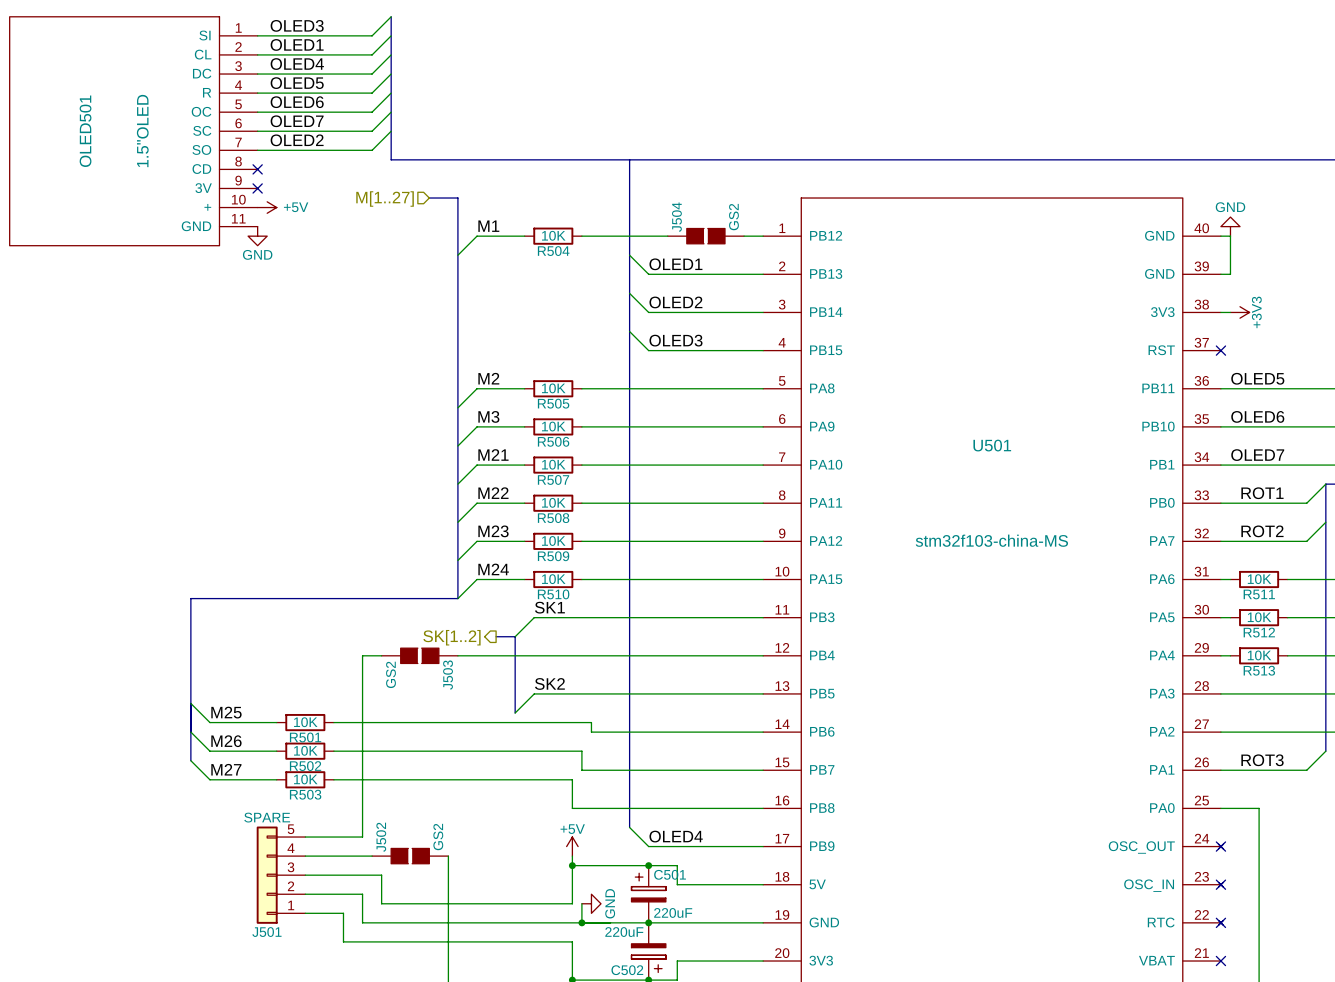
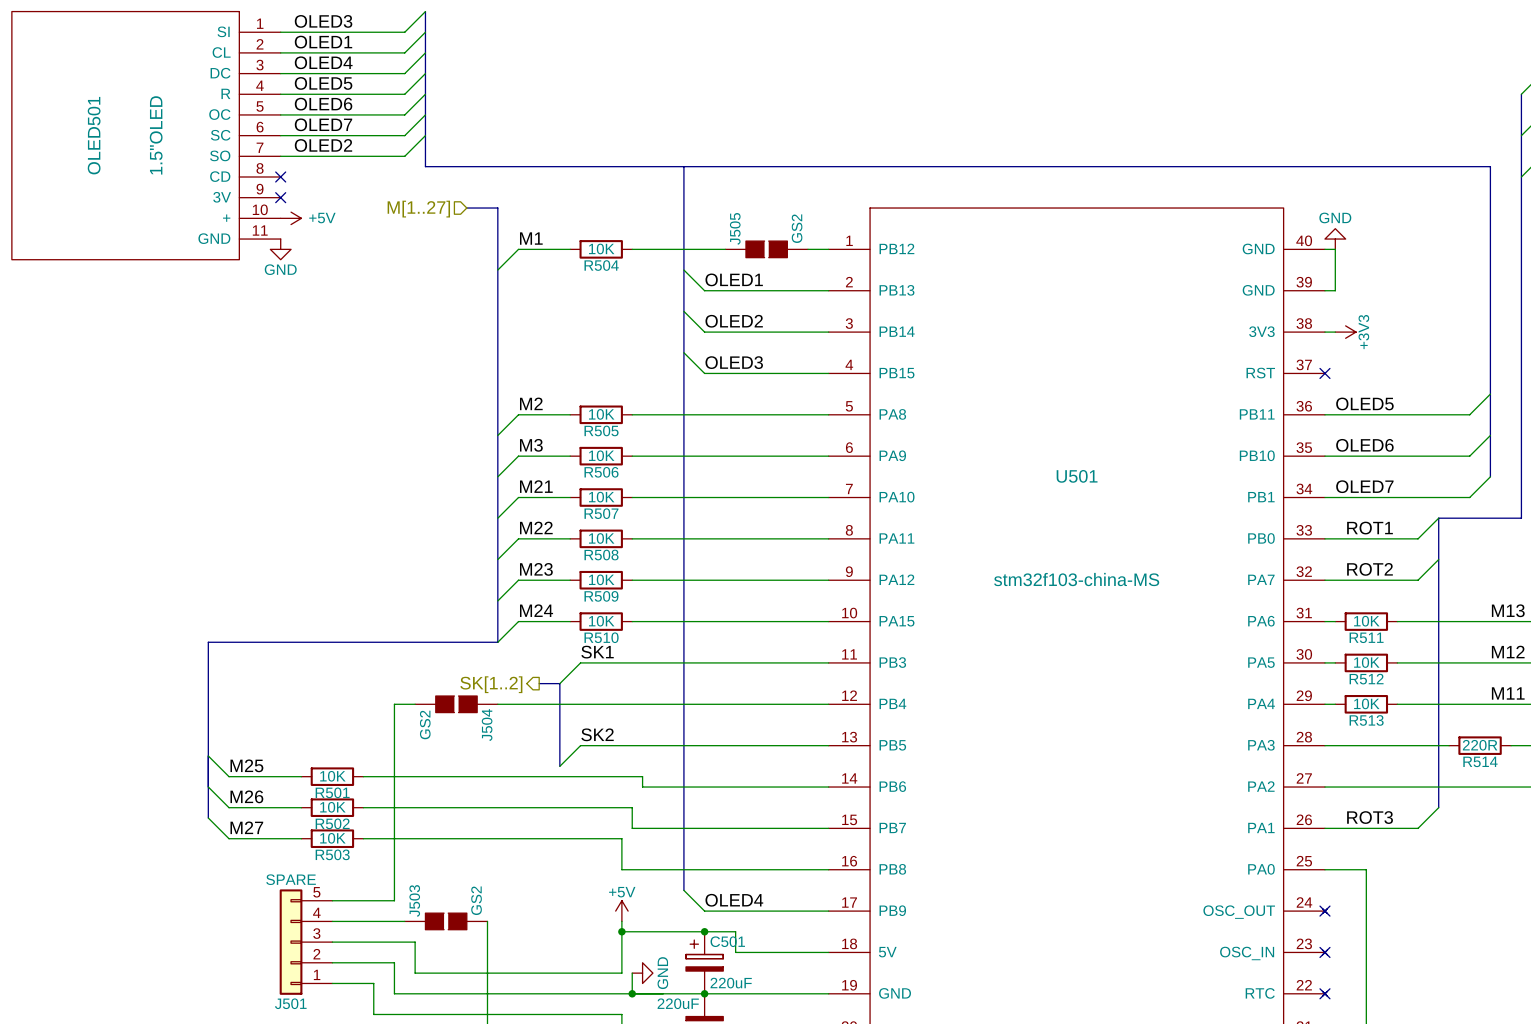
J504 name: J504 (676, 217) -> J505 (735, 228)
J503 name: J503 (448, 675) -> J504 (487, 725)
J502 name: J502 (381, 837) -> J503 (414, 900)

